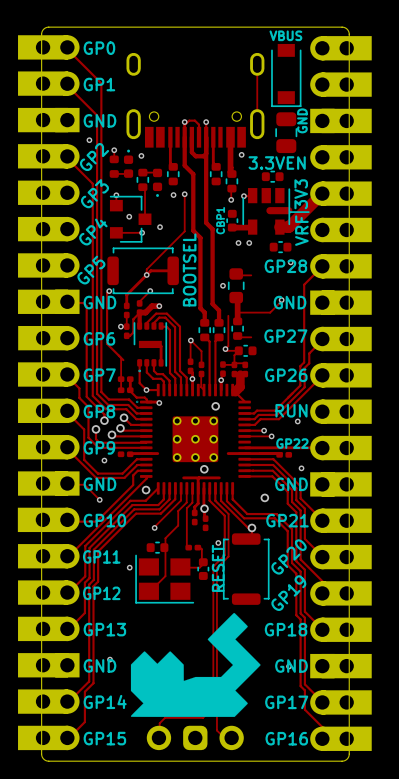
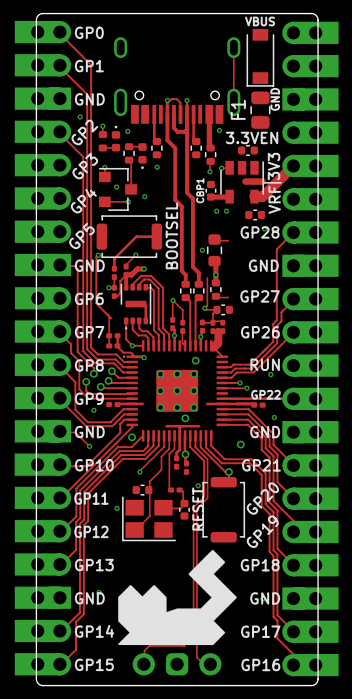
F1 name: none -> F1 (238, 109)
track: (184, 194) (184, 231) (146, 269) (146, 274) -> none
via: (184, 194) -> none
via: (146, 274) -> none
track: (281, 300) (270, 312) (237, 312) -> none
via position: (281, 300) -> (215, 274)

